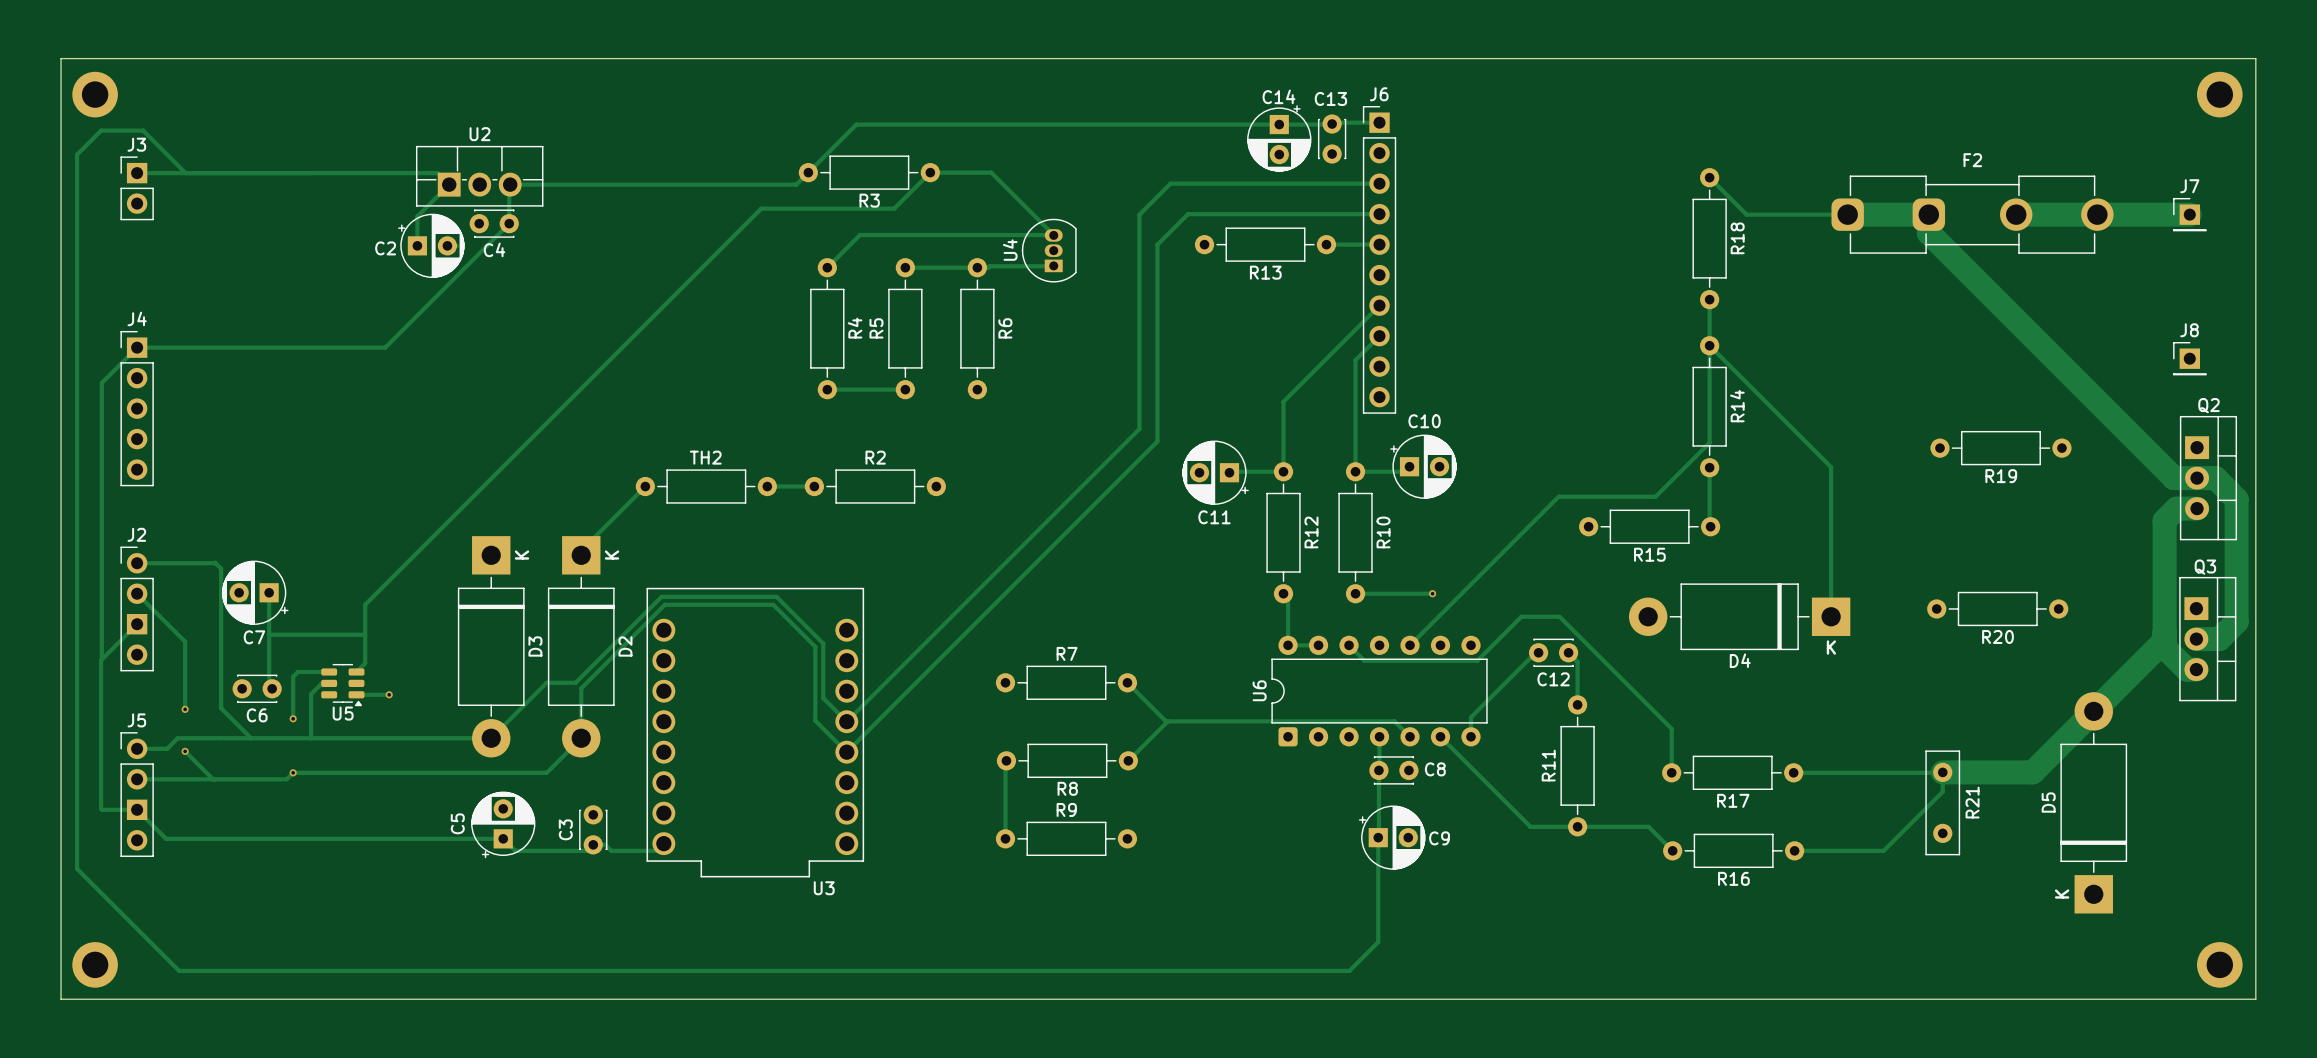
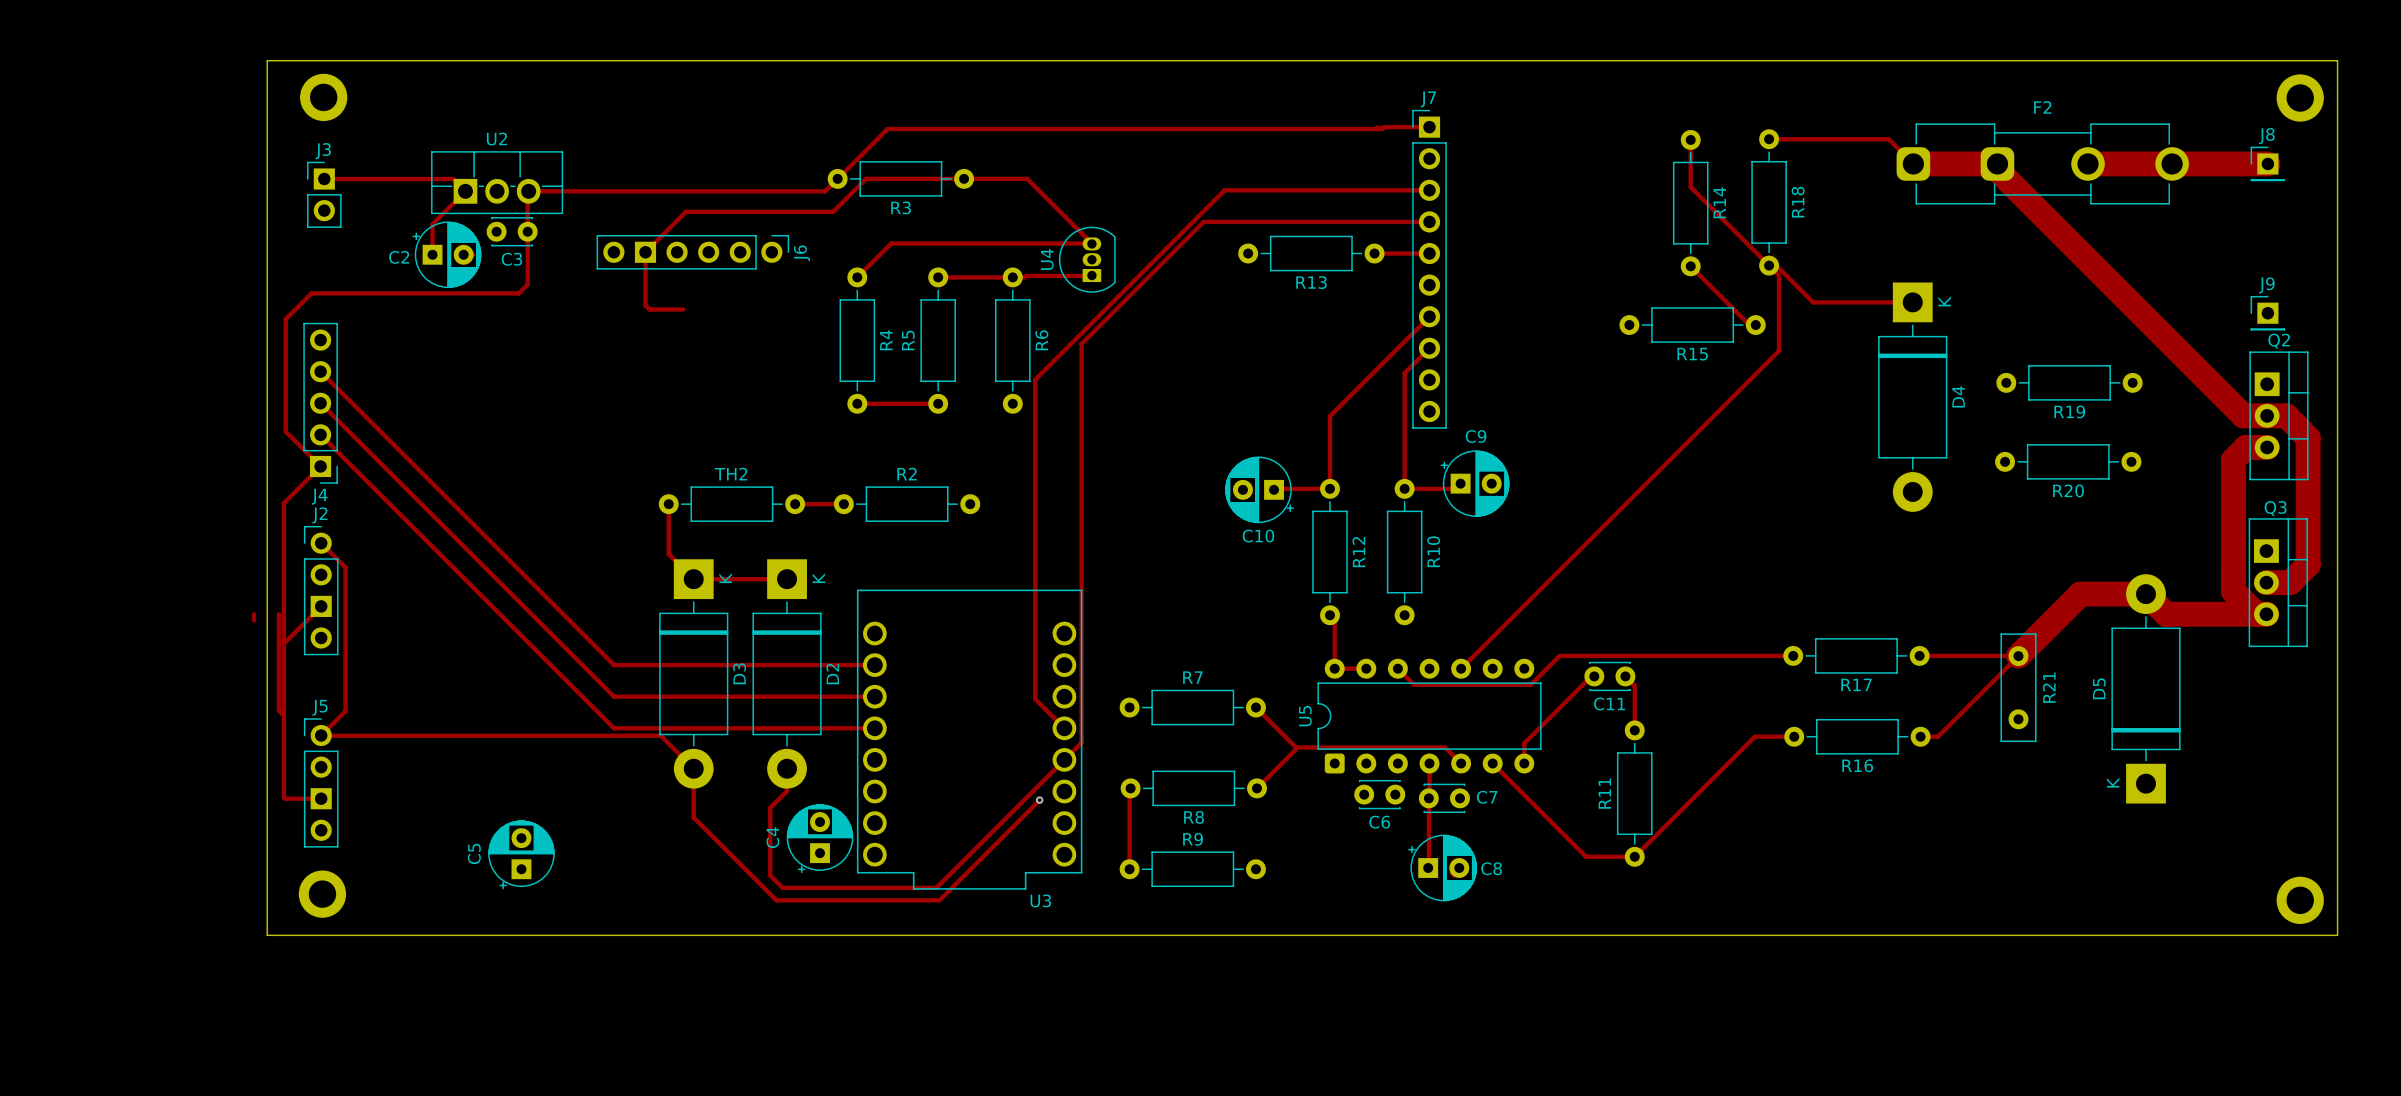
board edge: (257, 58) (61, 58) (61, 999) (2255, 999) (2255, 902) -> (267, 60) (267, 935) (2337, 935)
part position: (95, 94) -> (323, 97)
J6 name: J6 (1379, 94) -> J7 (1428, 99)
track: none -> (1769, 139) (1888, 139) (1913, 163) (1997, 163) (1997, 169) (2243, 415) (2286, 415) (2308, 438) (2308, 564) (2290, 582) (2266, 582)
C14: (1279, 138) -> none
C13: (1332, 139) -> none
track: (930, 172) (894, 208) (761, 208) (365, 604) (365, 663) (356, 670) -> (964, 178) (866, 178) (833, 211) (685, 211) (645, 252) (645, 305) (649, 309) (683, 309)
track: (137, 173) (437, 173) -> (324, 179) (453, 179)
track: (185, 173) (143, 130) (101, 130) (77, 154) (77, 868) (179, 970) (1349, 970) (1378, 942) (1378, 837) -> none
track: (1709, 177) (1746, 214) (1928, 214) (1928, 232) (2174, 478) (2215, 478) (2236, 499) (2236, 621) (2219, 639) (2196, 639) -> none
track: (1181, 183) (1170, 183) (1139, 214) (1139, 429) (846, 721) (823, 698) (823, 643) (776, 596) (661, 596) (575, 682) (546, 682) (491, 738) (177, 738) (167, 748) (137, 748) -> (1224, 190) (1035, 379) (1035, 699) (1064, 728)
J3 position: (137, 188) -> (324, 194)
track: (1187, 214) (1157, 244) (1157, 441) (846, 752) (815, 720) (815, 646) (773, 604) (664, 604) (581, 688) (581, 738) (546, 772) (293, 772) (286, 779) (137, 779) -> (1230, 221) (1203, 221) (1081, 343) (1081, 742) (936, 887) (782, 887) (770, 875) (770, 807) (787, 791) (787, 768)
F2 position: (1972, 214) -> (2042, 163)
track: (2016, 214) (2189, 214) -> (2088, 163) (2267, 163)
J7: (2189, 214) -> none
track: (509, 223) (385, 347) (137, 347) (101, 382) (101, 659) -> (527, 231) (527, 284) (518, 293) (311, 293) (285, 319) (285, 431) (320, 466) (283, 503) (283, 797) (321, 798)
R18 position: (1709, 238) -> (1769, 202)
J6: none -> (692, 252)
C4 name: C4 (494, 249) -> C3 (511, 259)
track: none -> (1769, 265) (1776, 265) (1813, 302) (1912, 302)
track: none -> (1690, 266) (1749, 325) (1755, 325)
track: (1709, 299) (1709, 442) (1655, 496) (1558, 496) -> (1690, 139) (1690, 187) (1779, 275) (1779, 350) (1615, 514)
J9: none -> (2267, 313)
track: (1709, 345) (1831, 467) (1831, 616) -> none
track: none -> (320, 371) (614, 665) (874, 665)
J8 position: (2189, 358) -> (2267, 163)
track: none -> (320, 403) (614, 696) (874, 696)
R14 position: (1709, 406) -> (1690, 203)
J4 rotation: 0° (137, 408) -> 180° (320, 403)
J4 position: (137, 408) -> (320, 403)
track: none -> (320, 434) (614, 728) (874, 728)
C10 name: C10 (1424, 421) -> C9 (1476, 436)
track: none -> (2267, 447) (2246, 447) (2233, 460) (2233, 591) (2256, 614)
R19 position: (2000, 448) -> (2069, 382)
track: (1709, 467) (1710, 526) -> none
Q2 position: (2208, 478) -> (2278, 415)
track: (645, 486) (581, 550) (581, 555) -> (668, 504) (668, 554) (693, 579) (787, 579) (787, 574)
track: (2197, 508) (2176, 508) (2164, 520) (2164, 647) (2186, 669) (2196, 669) -> none
C11 name: C11 (1214, 517) -> C10 (1258, 536)
track: none -> (321, 543) (345, 567) (345, 711) (321, 735) (660, 735) (693, 768)
R15 position: (1649, 526) -> (1692, 325)
track: (137, 563) (215, 562) (221, 568) (221, 708) (251, 738) -> none
track: none -> (321, 606) (283, 643)
C7: (255, 592) -> none
track: none -> (2266, 614) (2166, 614) (2145, 594) (2080, 594) (2018, 656)
track: (137, 593) (185, 641) (185, 709) -> none
track: (1355, 593) (1432, 593) -> none
via: (1432, 593) -> none
J2 position: (137, 608) -> (321, 590)
R20 position: (1997, 608) -> (2068, 461)
D4 rotation: 0° (1739, 616) -> 90° counterclockwise (1912, 397)
D4 position: (1739, 616) -> (1912, 397)
track: (137, 624) (101, 660) (101, 808) (137, 809) (166, 838) (503, 838) (515, 850) (587, 850) (593, 844) (605, 844) (611, 850) (656, 850) (663, 843) -> none
track: (1505, 632) (1521, 616) (1559, 616) (1671, 728) (1671, 772) -> (1559, 655) (1793, 655)
track: none -> (1919, 655) (2018, 656)
track: none -> (2018, 656) (1937, 736) (1920, 736)
track: (269, 634) (365, 634) -> none
Q3 position: (2207, 639) -> (2278, 582)
track: (2164, 640) (2032, 772) (1942, 772) -> none
D3 position: (491, 646) -> (693, 673)
D2 position: (581, 646) -> (787, 673)
track: (329, 671) (297, 671) (293, 676) (293, 718) -> none
C12 name: C12 (1553, 679) -> C11 (1609, 703)
R7 position: (1066, 682) -> (1192, 707)
track: (1127, 682) (1166, 721) (1250, 721) -> none
track: none -> (1255, 707) (1295, 747) (1256, 788)
track: (329, 683) (321, 683) (311, 694) (311, 738) -> none
U5: (342, 685) -> none
C6 position: (257, 688) -> (1379, 794)
U6 name: U6 (1259, 690) -> U5 (1305, 716)
track: (356, 694) (389, 694) -> none
via: (389, 694) -> none
via: (185, 709) -> none
via: (293, 718) -> none
track: (1167, 721) (1128, 760) -> none
U3 position: (755, 732) -> (969, 739)
track: none -> (693, 768) (693, 817) (776, 900) (939, 900) (1039, 800)
track: (185, 751) (213, 779) -> none
via: (185, 751) -> none
track: (1006, 760) (1005, 838) -> (1130, 788) (1129, 869)
R8 position: (1067, 760) -> (1193, 788)
C8 name: C8 (1435, 769) -> C7 (1487, 797)
via: (293, 772) -> none
via: none -> (1039, 800)
R17 position: (1732, 772) -> (1856, 655)
track: (1942, 772) (1942, 791) (1883, 850) (1794, 850) -> none
track: (1942, 772) (1793, 772) -> none
J5 position: (137, 794) -> (321, 782)
R21 position: (1942, 802) -> (2018, 687)
D5 position: (2093, 802) -> (2145, 688)
C4: none -> (820, 838)
track: (1577, 826) (1648, 826) (1672, 850) -> (1634, 856) (1754, 736) (1794, 736)
C3: (593, 829) -> none
R9 position: (1066, 838) -> (1192, 869)
C9 name: C9 (1439, 838) -> C8 (1491, 868)
R16 position: (1733, 850) -> (1857, 736)
part position: (95, 964) -> (322, 894)
part position: (2219, 964) -> (2300, 900)

